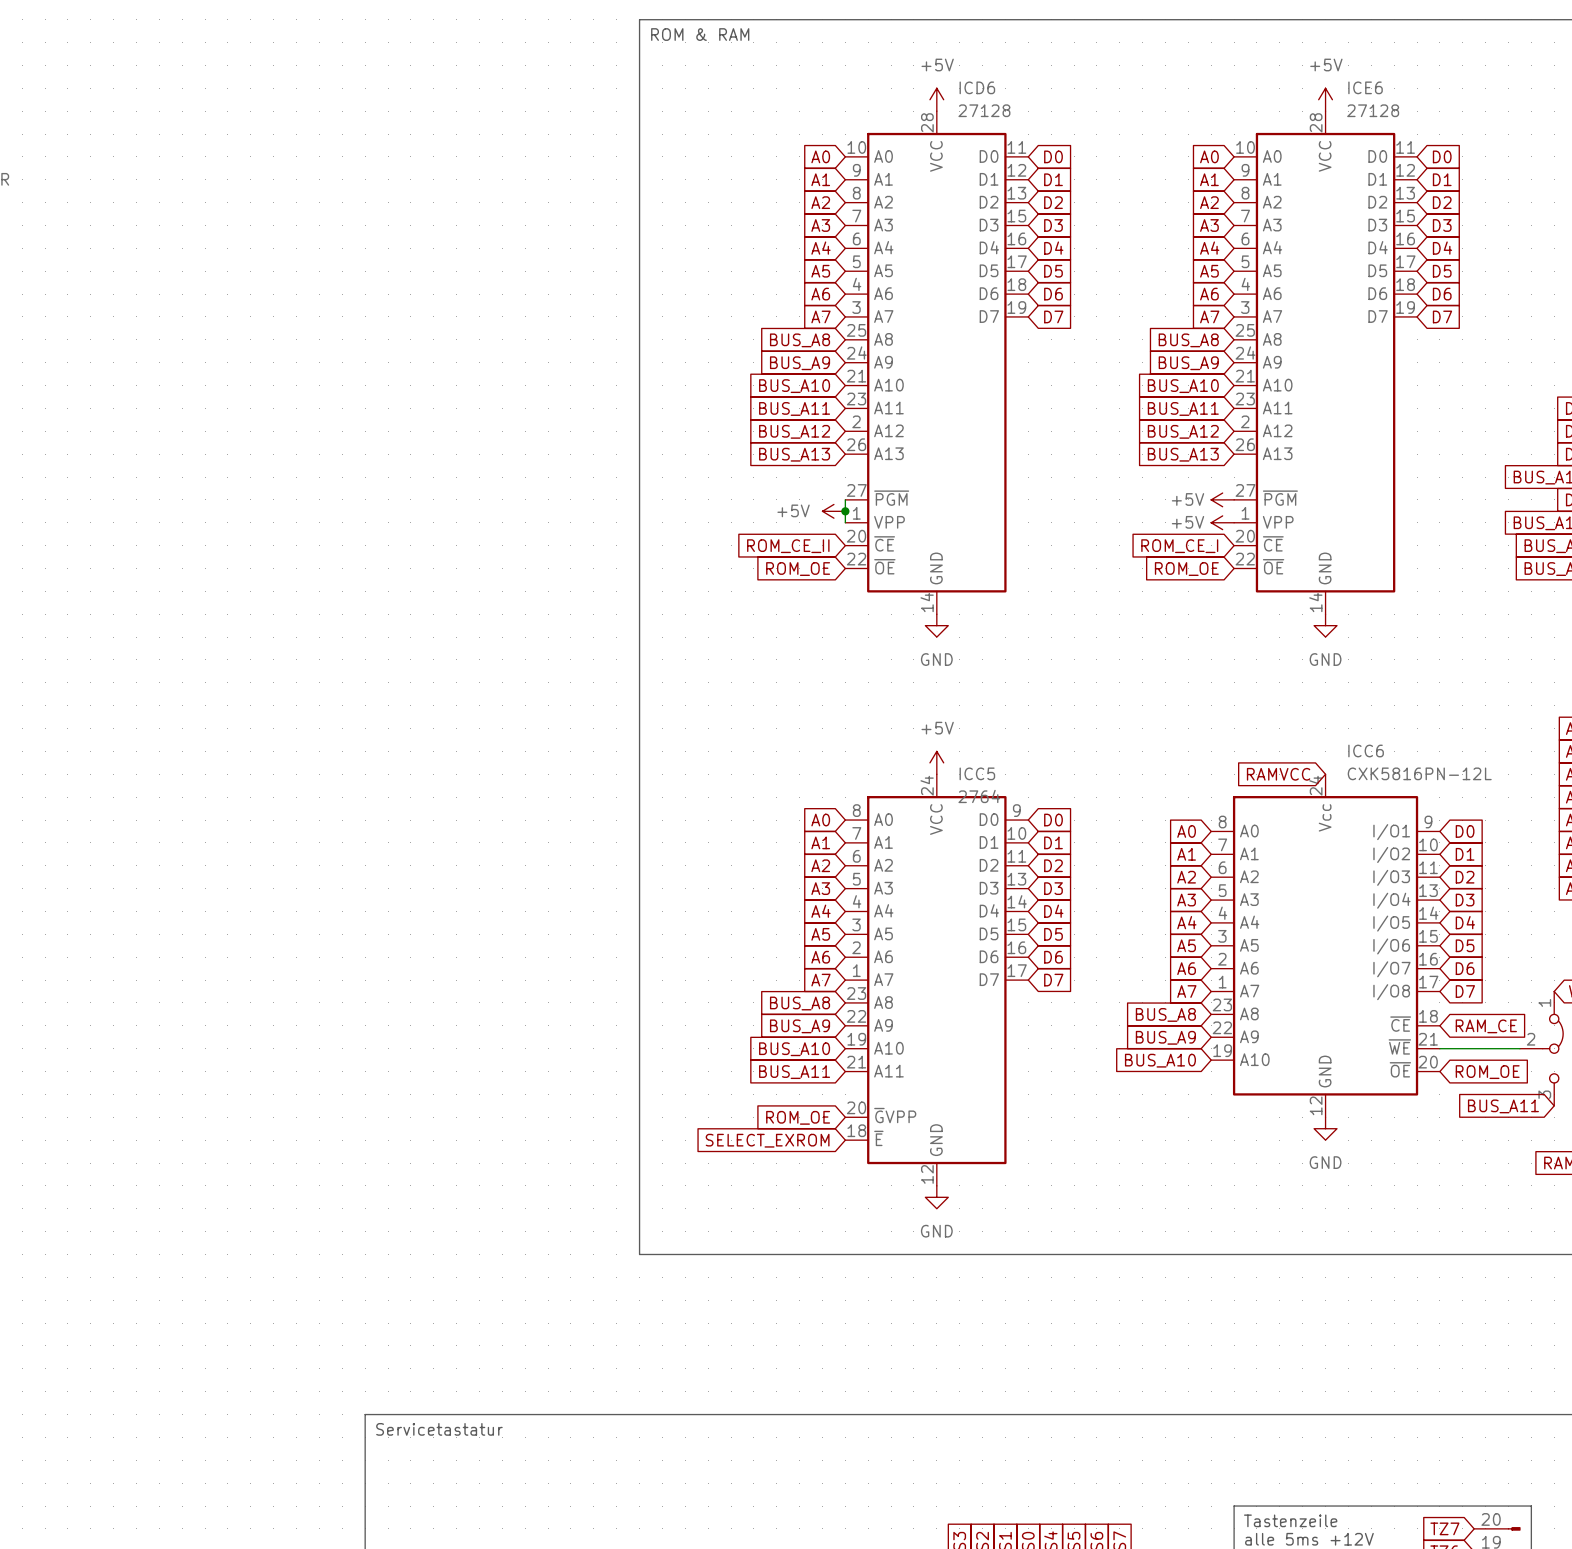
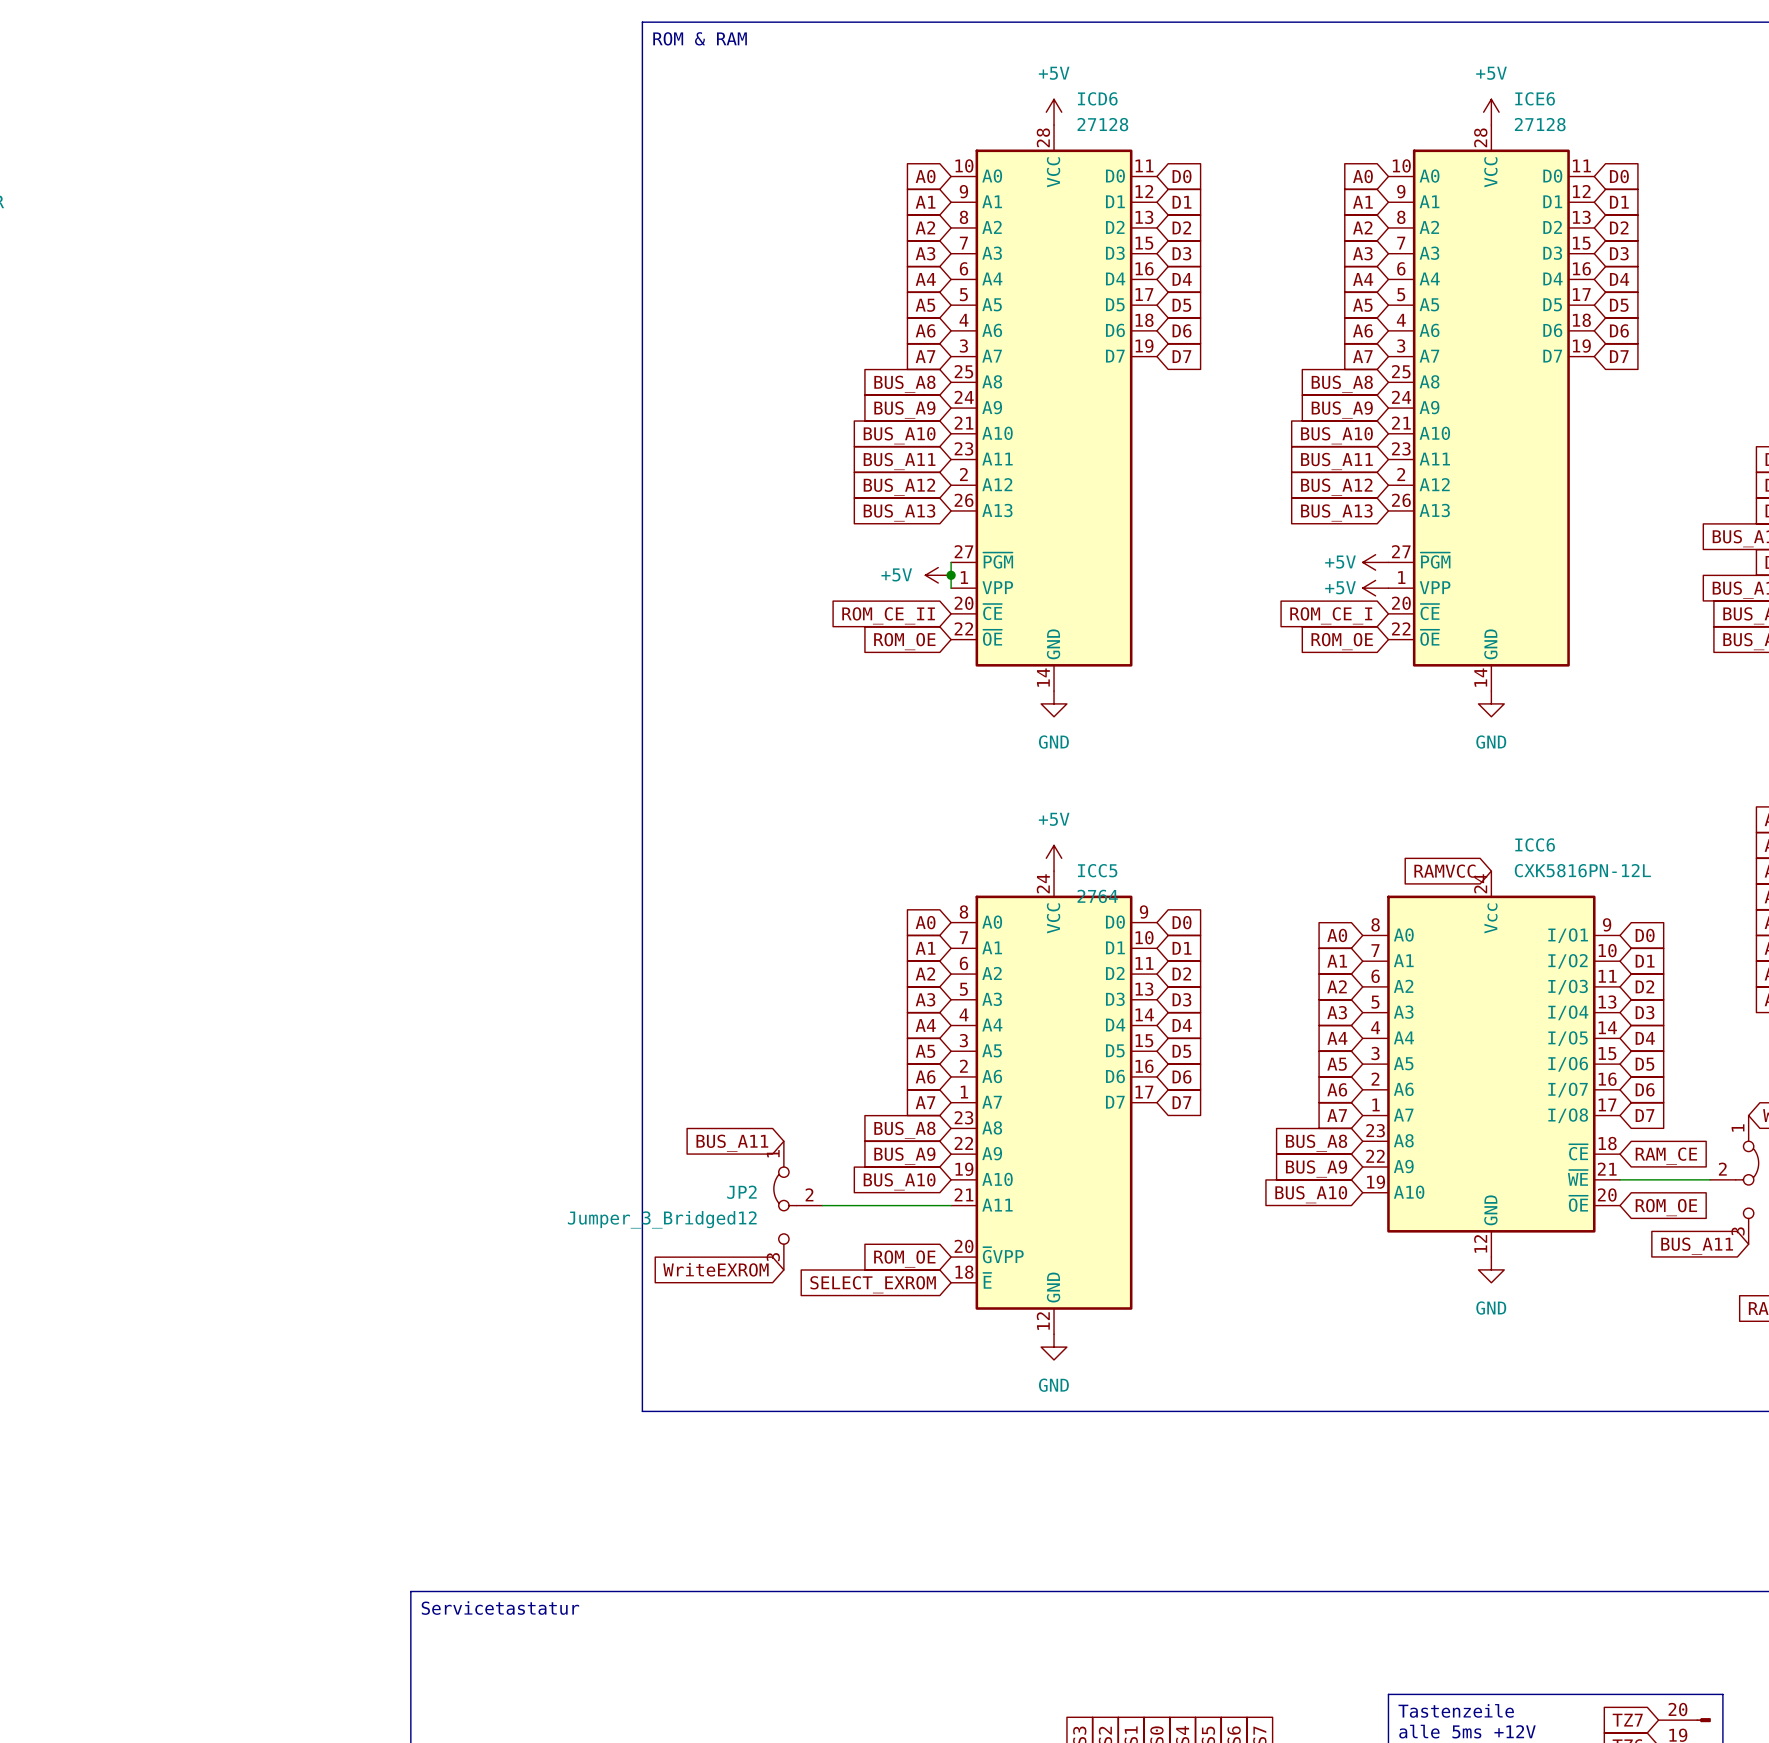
line: (639, 19) (639, 1254) -> (719, 22) (642, 22) (642, 1411) (719, 1411)
text position: ROM & RAM (700, 34) -> ROM & RAM (700, 38)
JP2: none -> Jumper_3_Bridged12 (798, 1205)
wire: none -> (822, 1205) (951, 1205)
global label position: BUS_A11 (794, 1072) -> BUS_A11 (732, 1143)
global label: none -> WriteEXROM (715, 1269)

